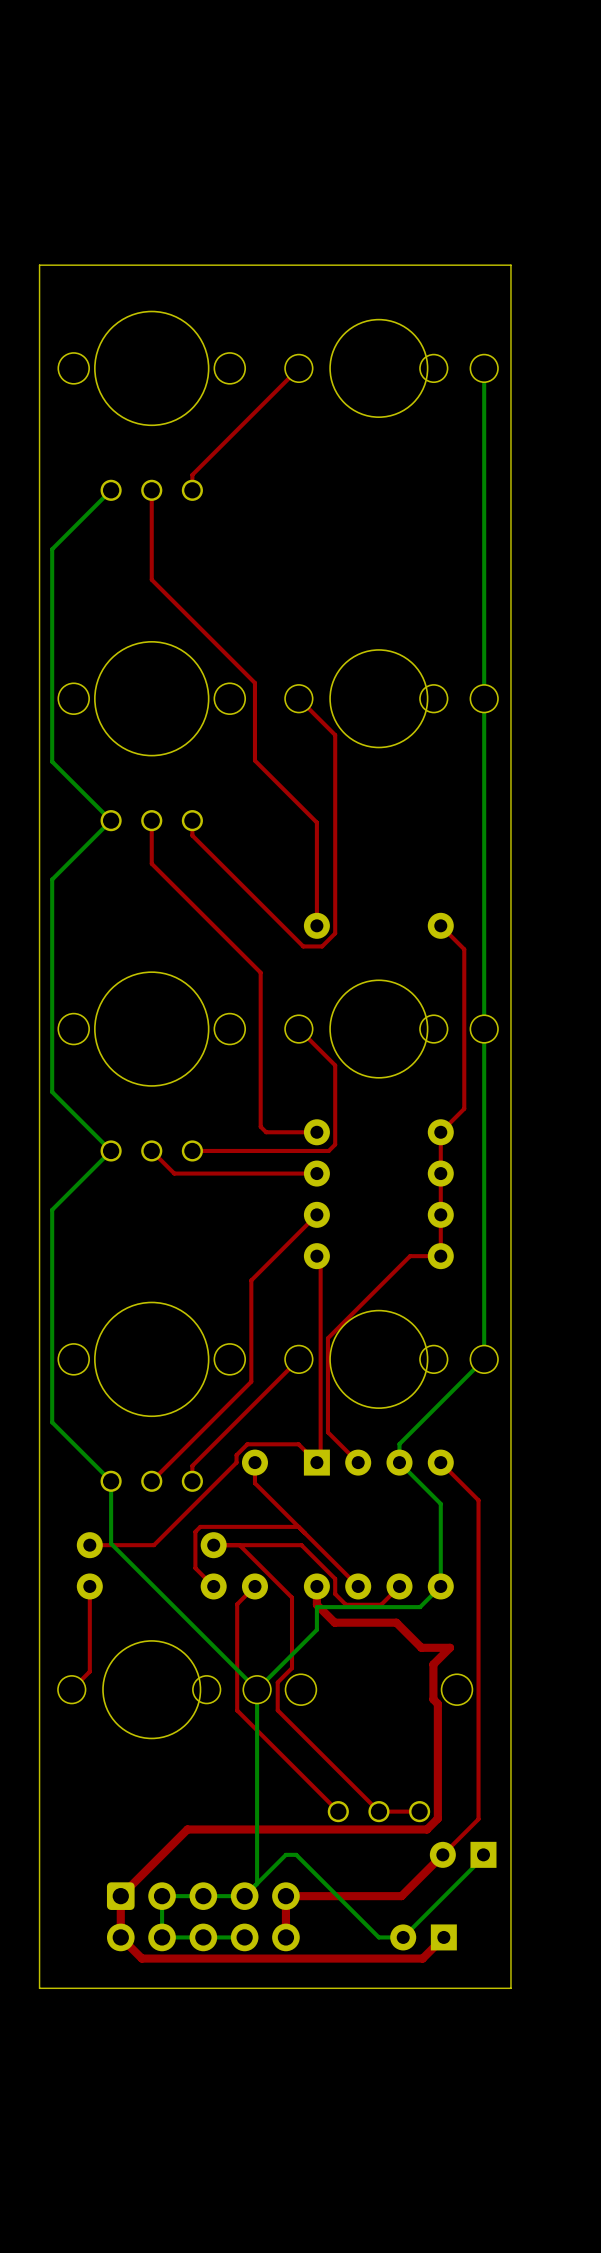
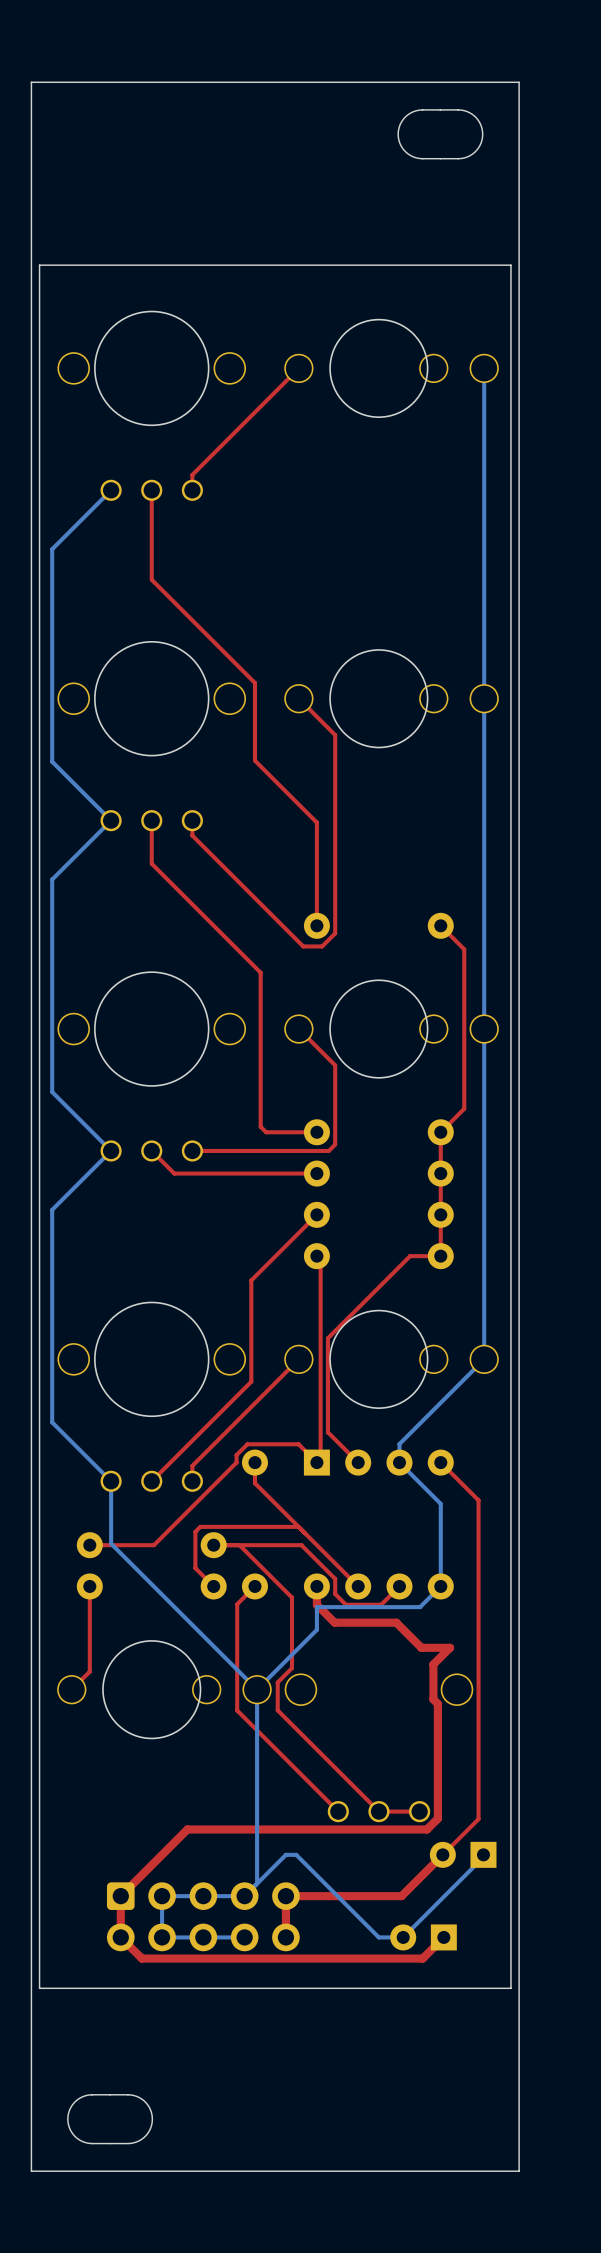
board edge: none -> (519, 82) (31, 82) (31, 2171) (519, 2171) (519, 82)
board edge: none -> (458, 109) (419, 110) (407, 114) (401, 122) (398, 131) (398, 140) (403, 149) (410, 155) (419, 158) (461, 158) (472, 154) (481, 142) (481, 128) (474, 116) (466, 111) (458, 109)
board edge: none -> (127, 2094) (89, 2095) (77, 2099) (71, 2106) (68, 2115) (68, 2125) (72, 2134) (80, 2140) (89, 2143) (130, 2143) (141, 2139) (150, 2127) (151, 2113) (144, 2100) (136, 2096) (127, 2094)

